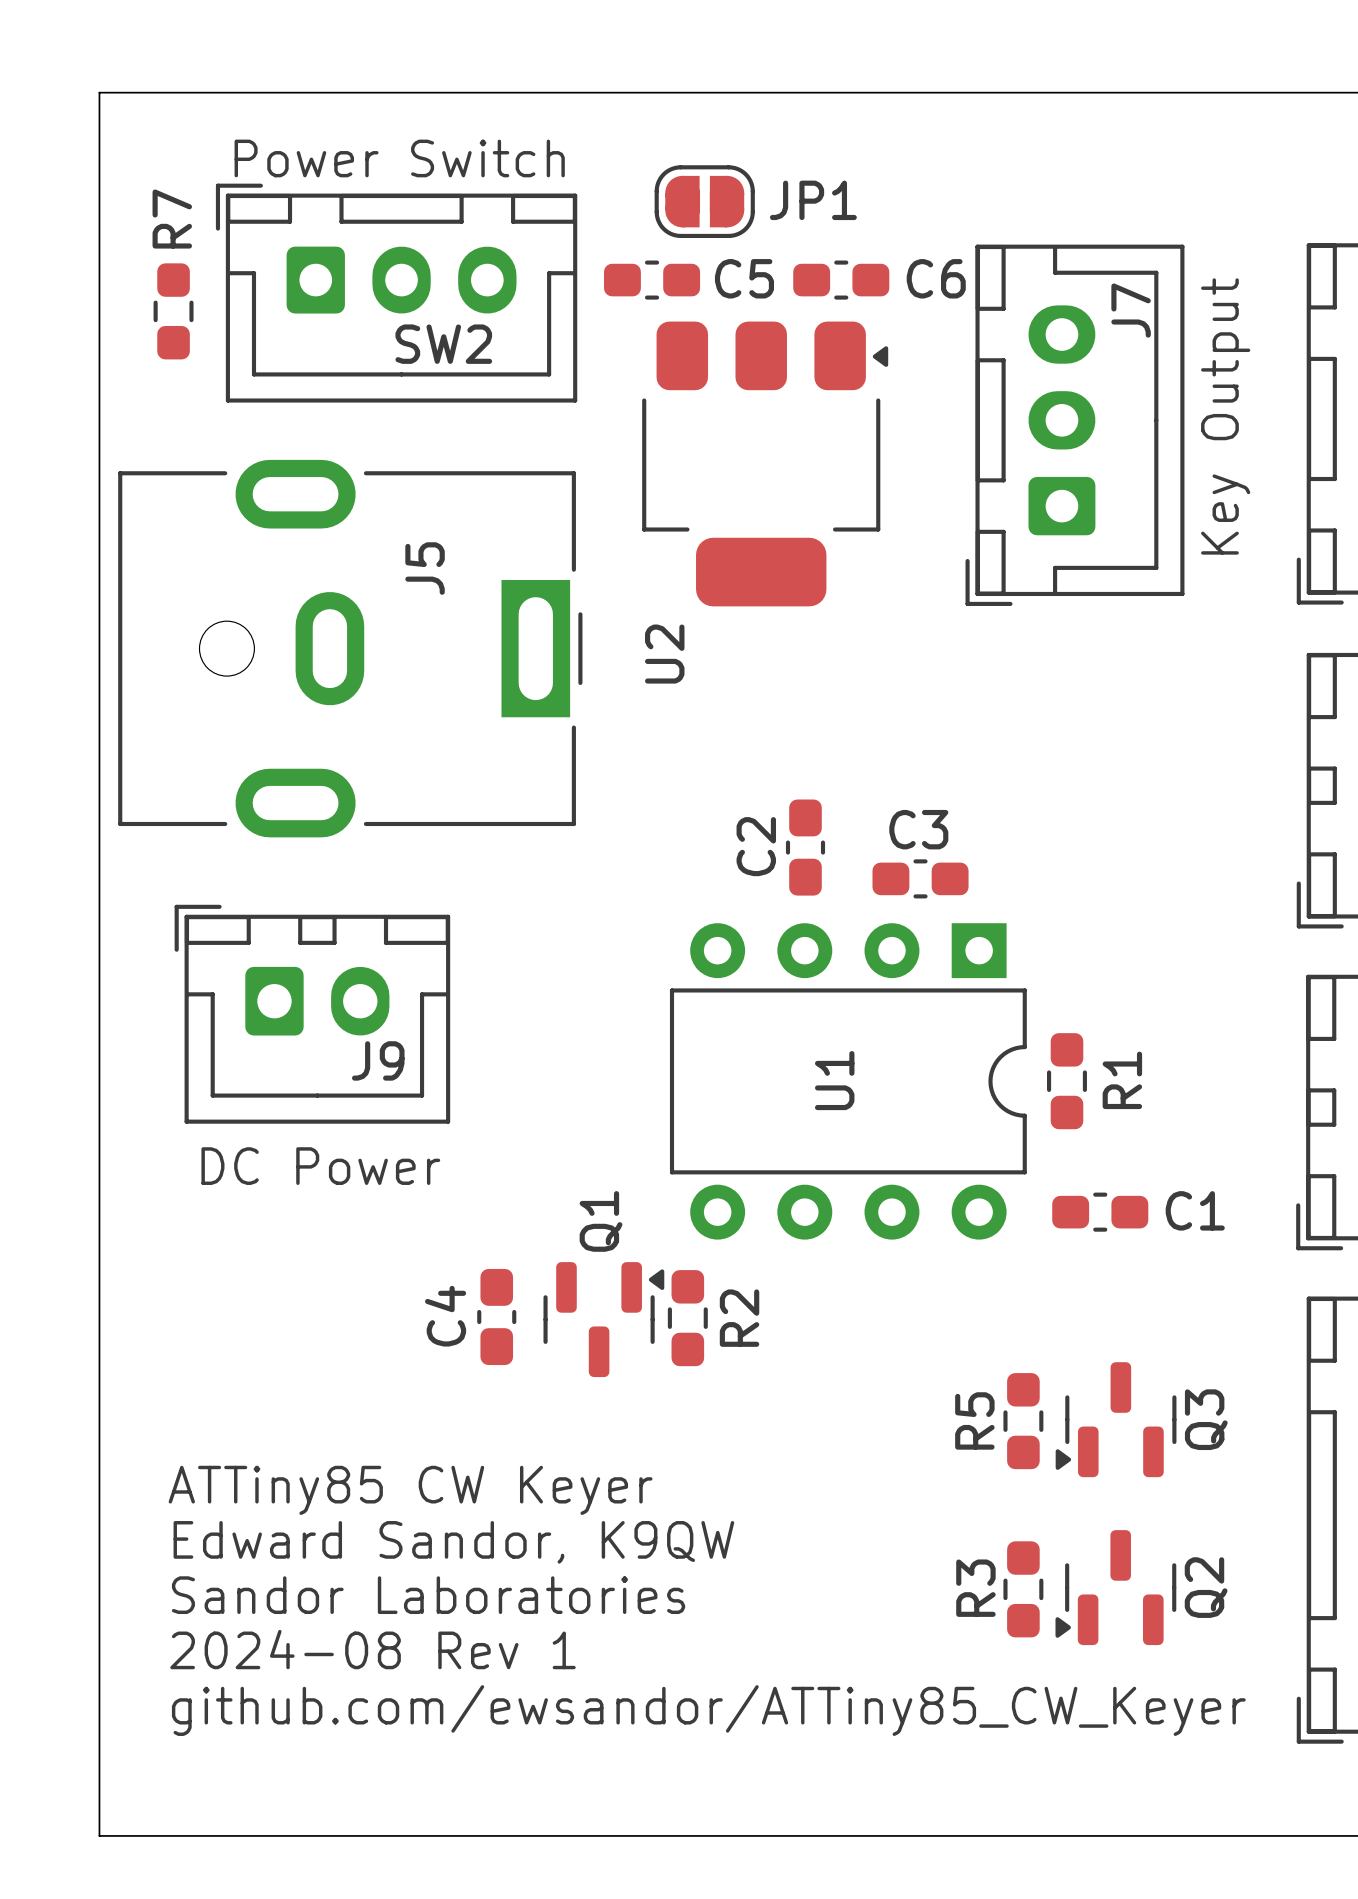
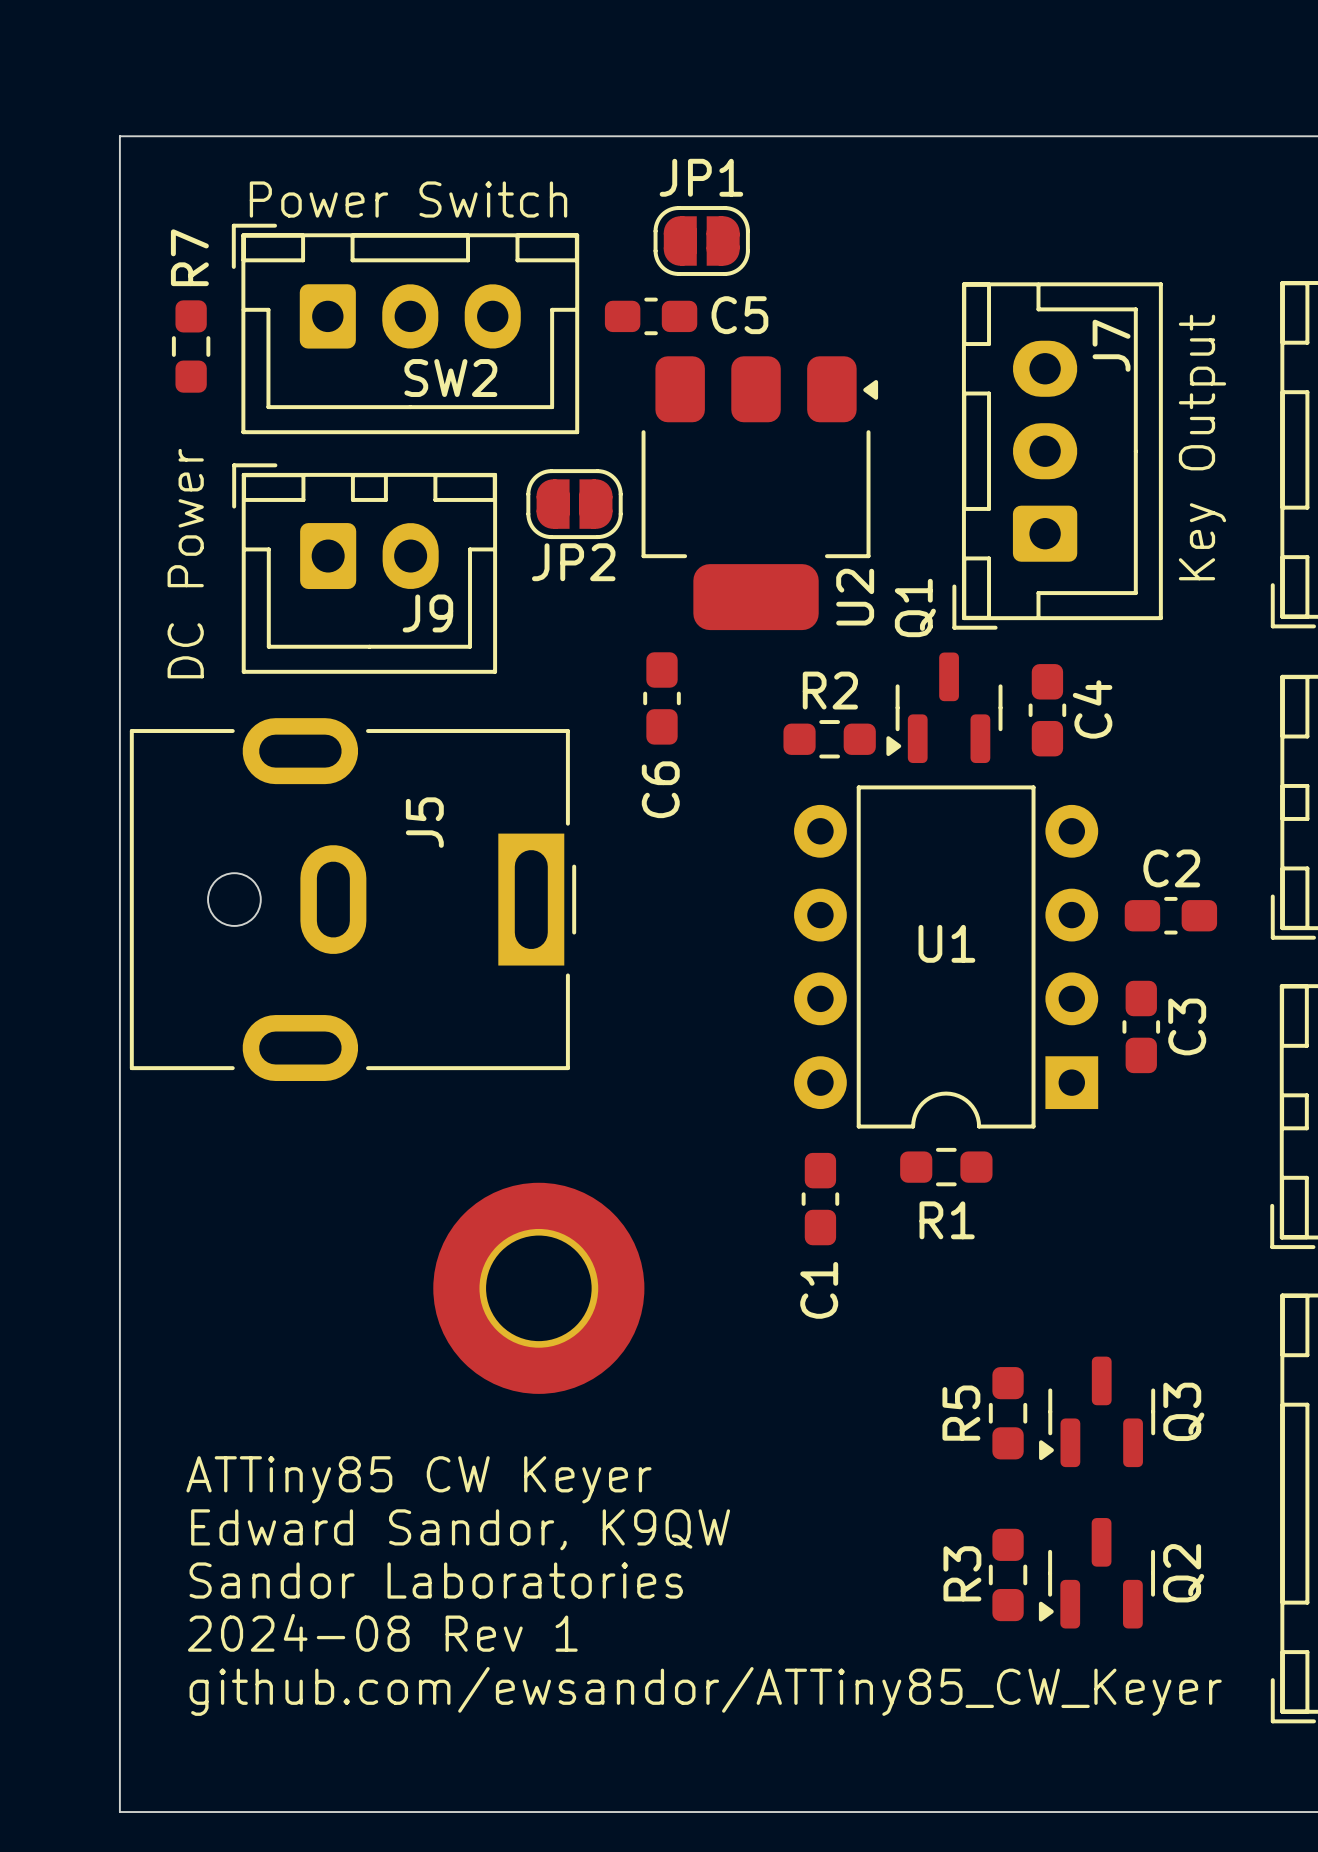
JP1 name position: JP1 (813, 200) -> JP1 (701, 177)
C6 rotation: 0° (841, 280) -> 90° clockwise (662, 698)
C6 position: (841, 280) -> (662, 698)
JP2: none -> (574, 504)
J5 position: (350, 648) -> (353, 899)
U2 name position: U2 (664, 654) -> U2 (855, 597)
C2 rotation: 0° (805, 847) -> 90° clockwise (1170, 915)
C2 position: (805, 847) -> (1170, 915)
C3 rotation: 0° (920, 878) -> 90° clockwise (1141, 1026)
C3 position: (920, 878) -> (1141, 1026)
J9 position: (312, 1014) -> (364, 568)
U1 rotation: 0° (848, 1081) -> 90° clockwise (946, 956)
R1 rotation: 0° (1066, 1081) -> 90° clockwise (946, 1167)
R1 position: (1066, 1081) -> (946, 1167)
text rotation: 0° (320, 1166) -> 90° counterclockwise (185, 563)
text position: DC Power (320, 1166) -> DC Power (185, 563)
C1 rotation: 0° (1100, 1212) -> 90° clockwise (820, 1199)
C1 position: (1100, 1212) -> (820, 1199)
part: none -> (538, 1288)
C4 name position: C4 (445, 1316) -> C4 (1092, 709)
C4 position: (496, 1317) -> (1047, 710)
R2 rotation: 0° (687, 1318) -> 90° clockwise (829, 739)
R2 position: (687, 1318) -> (829, 739)
R2 name position: R2 (739, 1318) -> R2 (830, 690)
Q1 rotation: 0° (603, 1319) -> 180° (944, 707)
Q1 position: (603, 1319) -> (944, 707)

